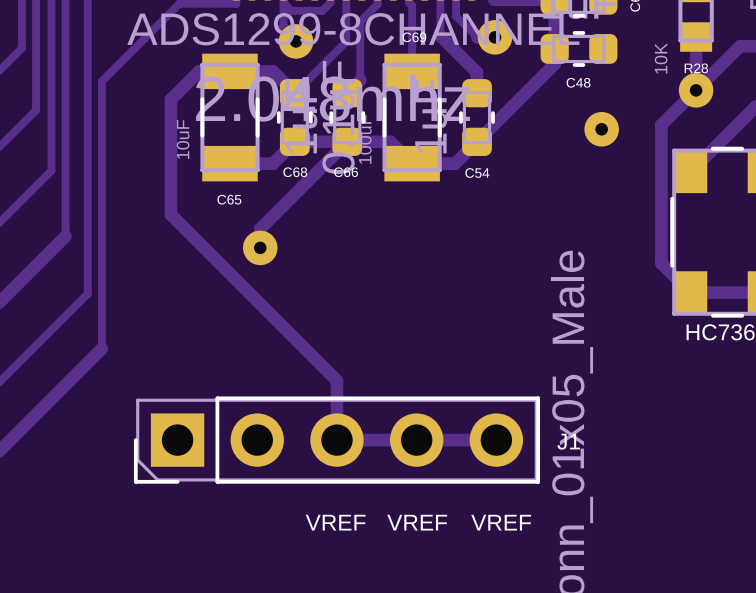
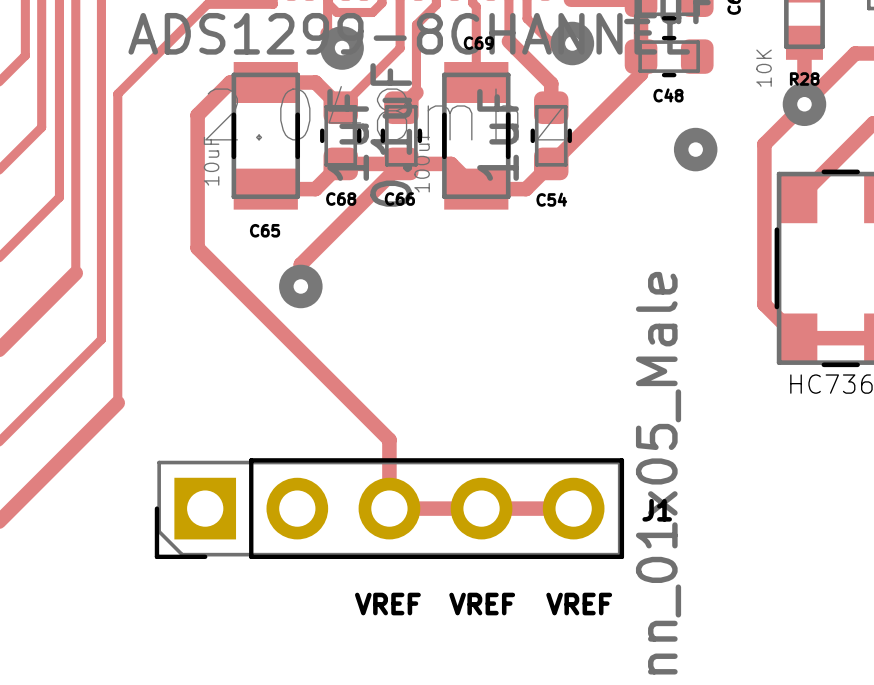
part: (494, 37) -> none
via: none -> (572, 43)
part: (296, 41) -> none
via: none -> (342, 48)
part: (696, 90) -> none
via: none -> (804, 104)
part: (601, 129) -> none
via: none -> (695, 149)
part: (260, 247) -> none
via: none -> (300, 286)

